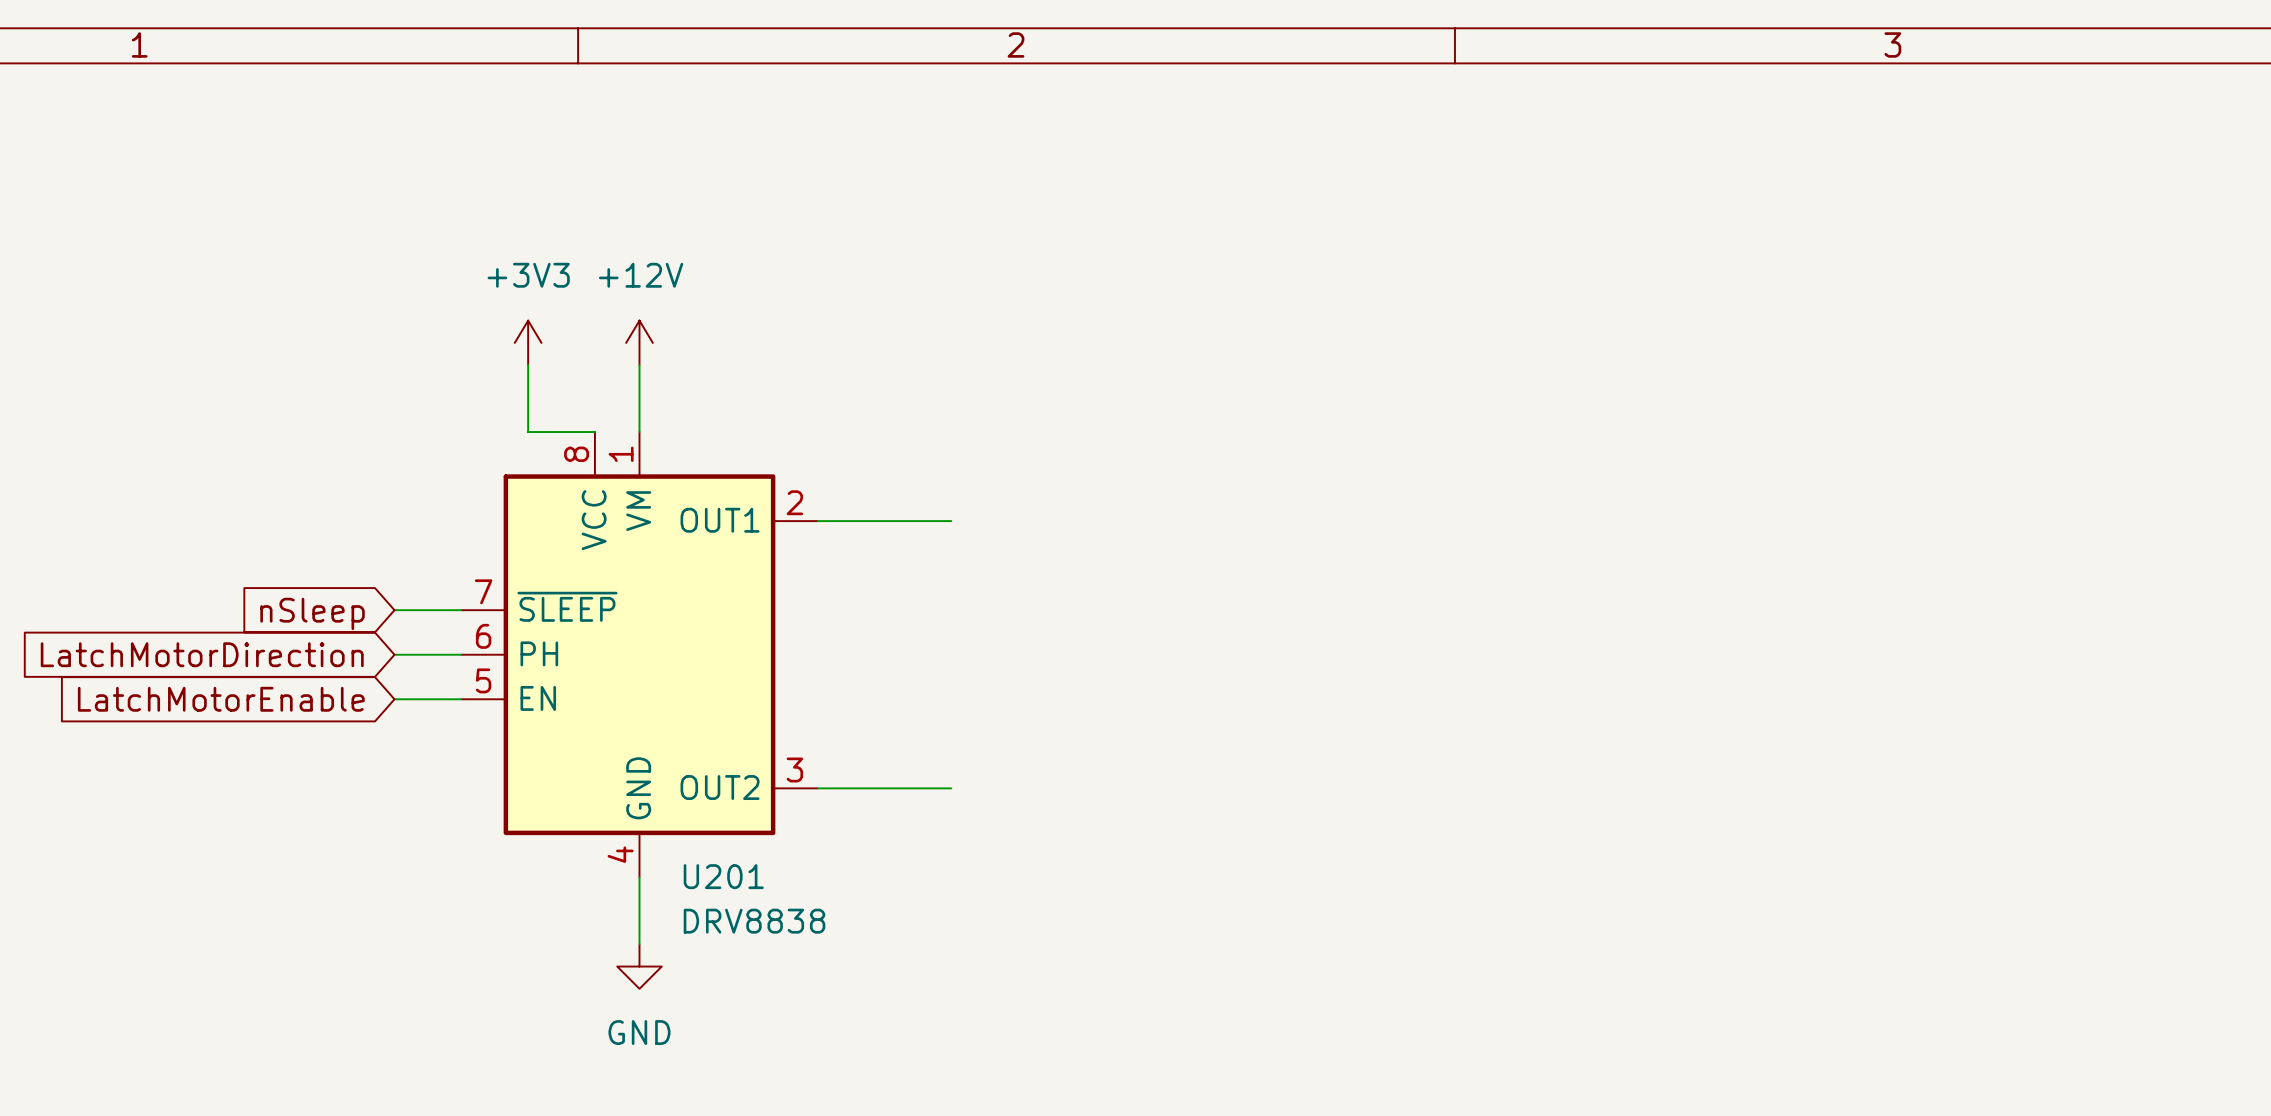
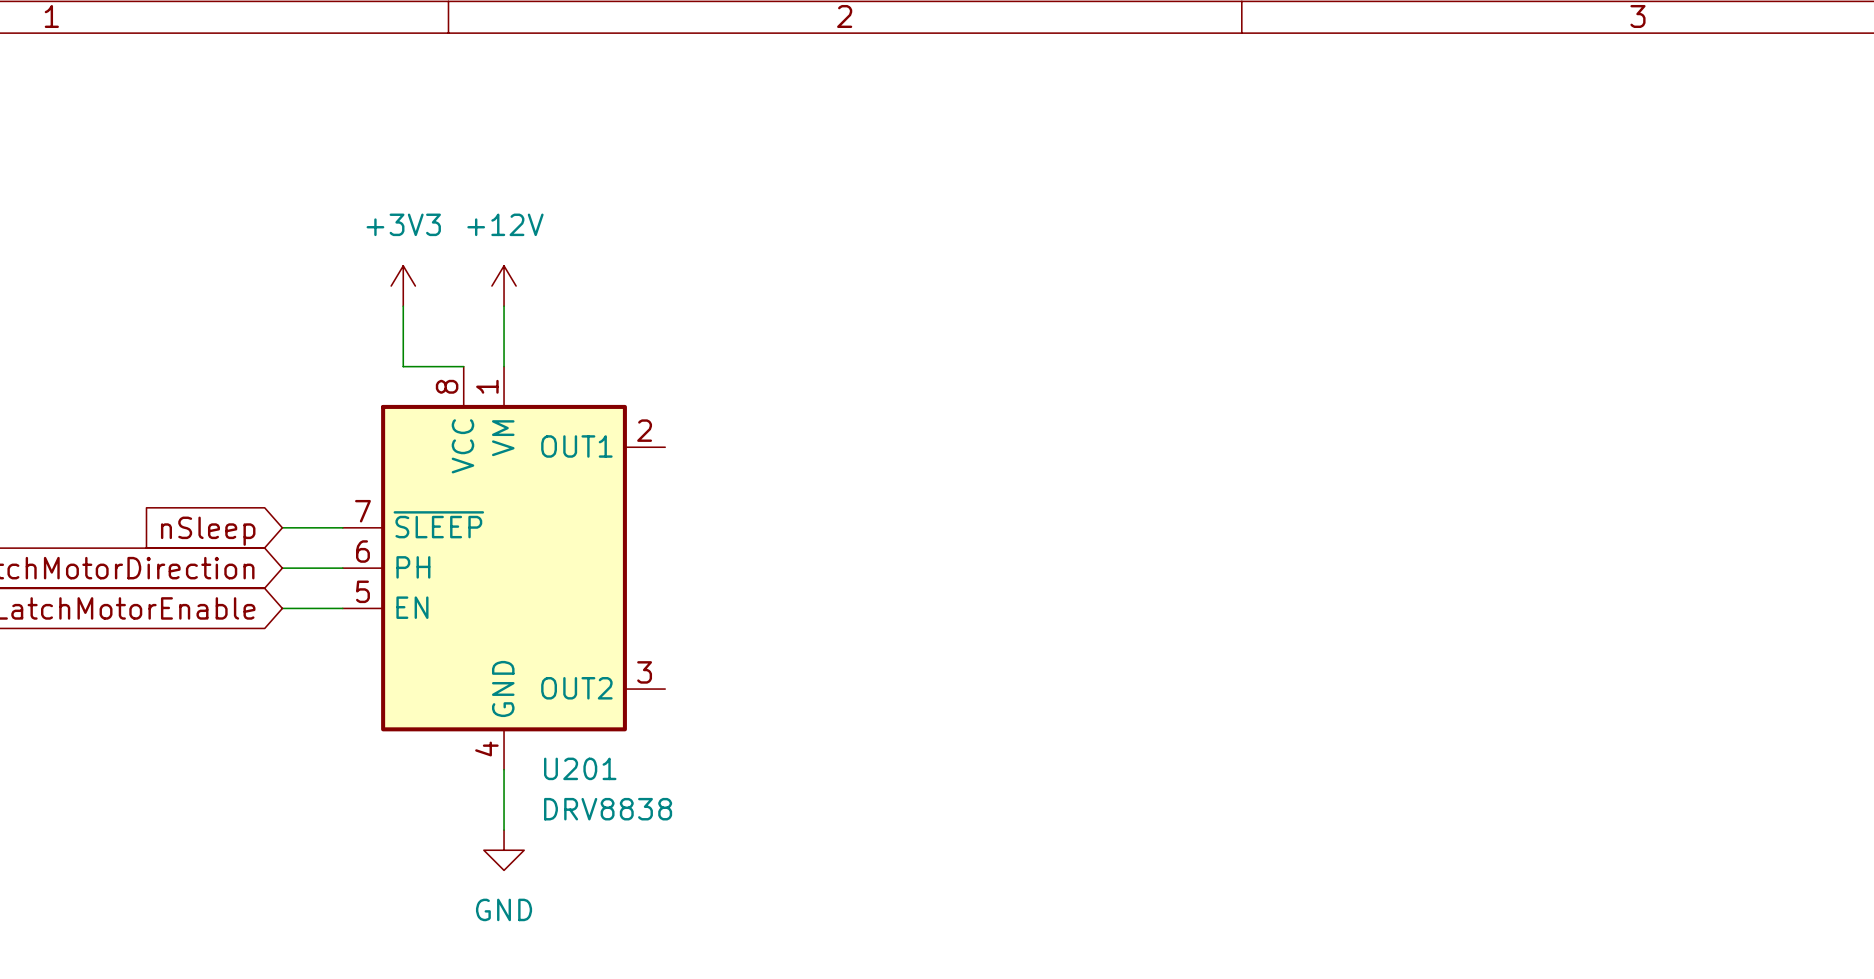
wire: (817, 521) (951, 521) -> none
wire: (817, 788) (951, 788) -> none

